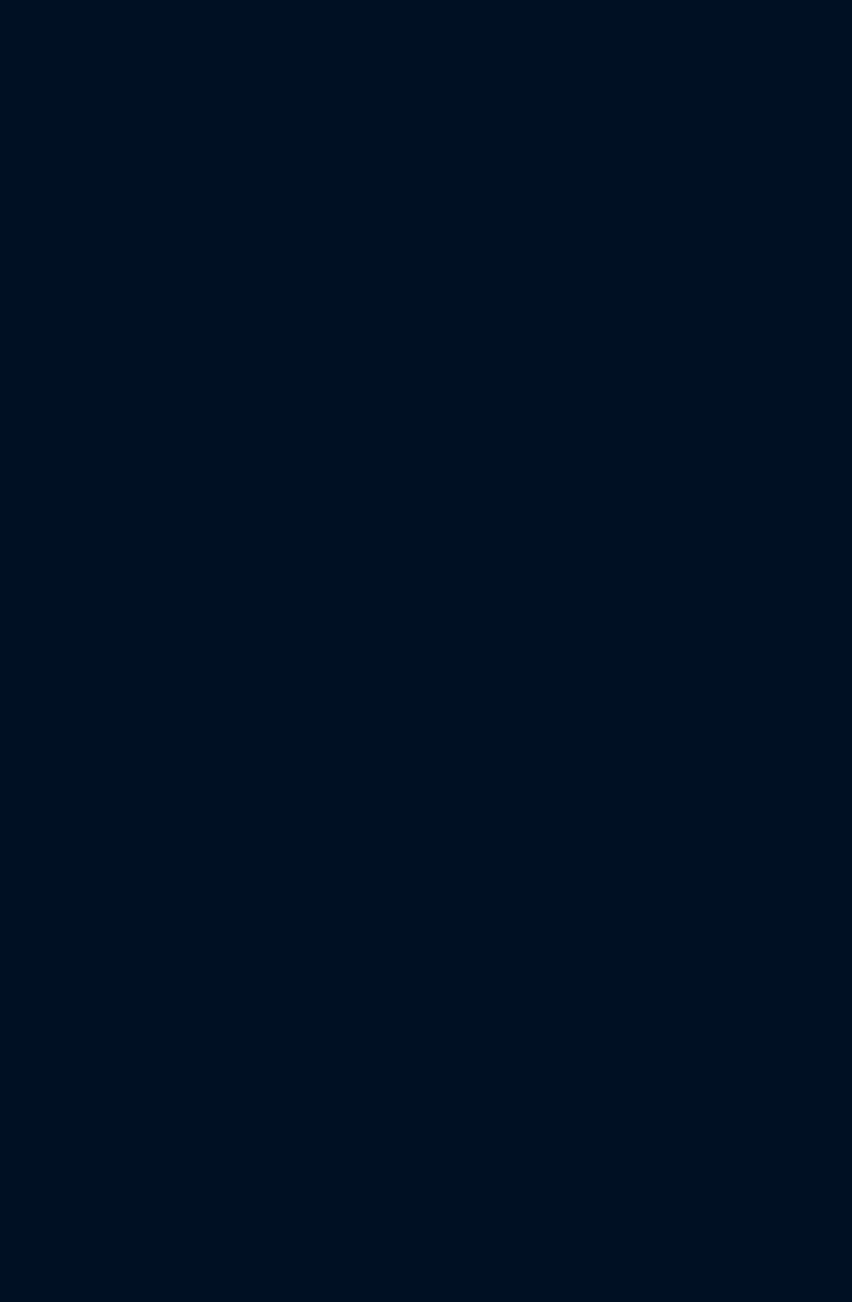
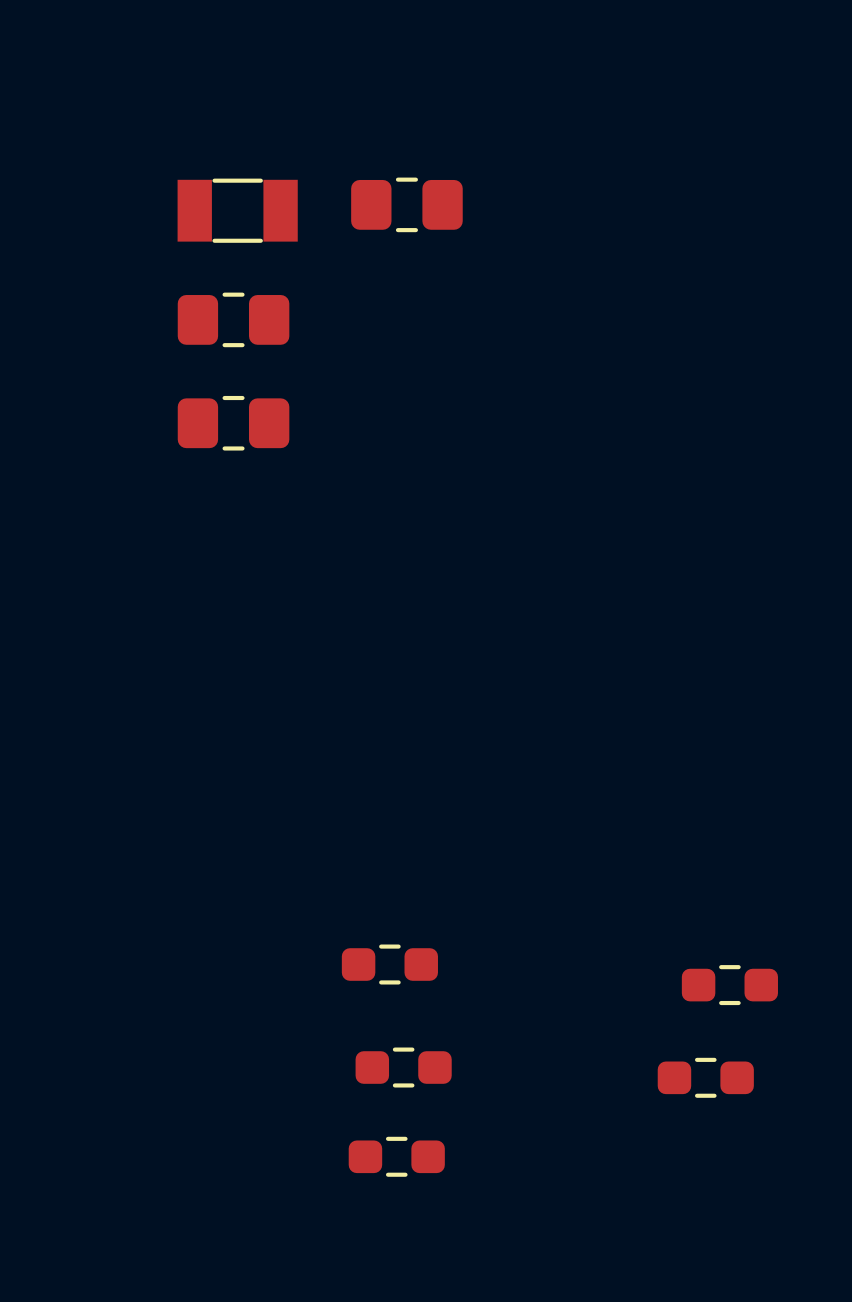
part: none -> (406, 204)
part: none -> (237, 210)
part: none -> (233, 319)
part: none -> (233, 423)
part: none -> (389, 964)
part: none -> (729, 985)
part: none -> (403, 1067)
part: none -> (705, 1077)
part: none -> (396, 1156)

